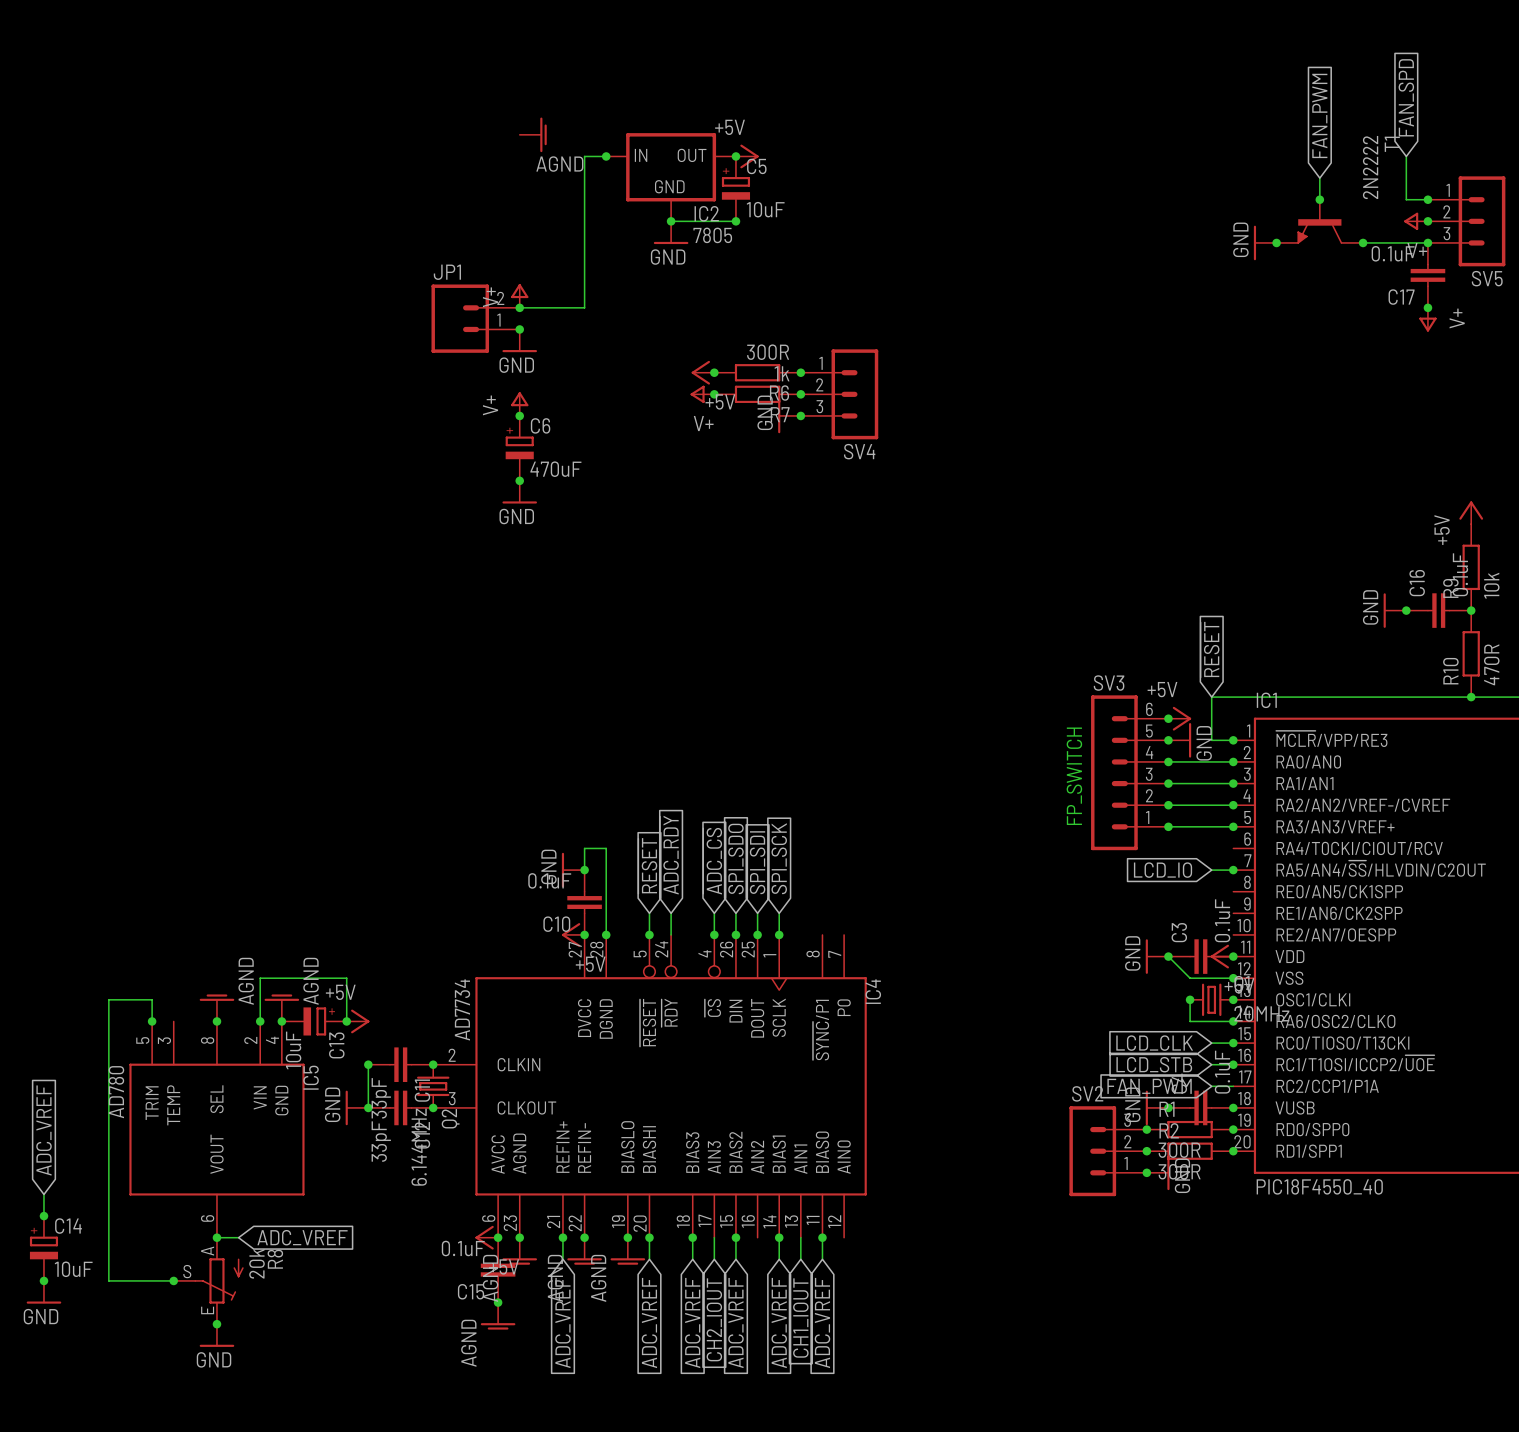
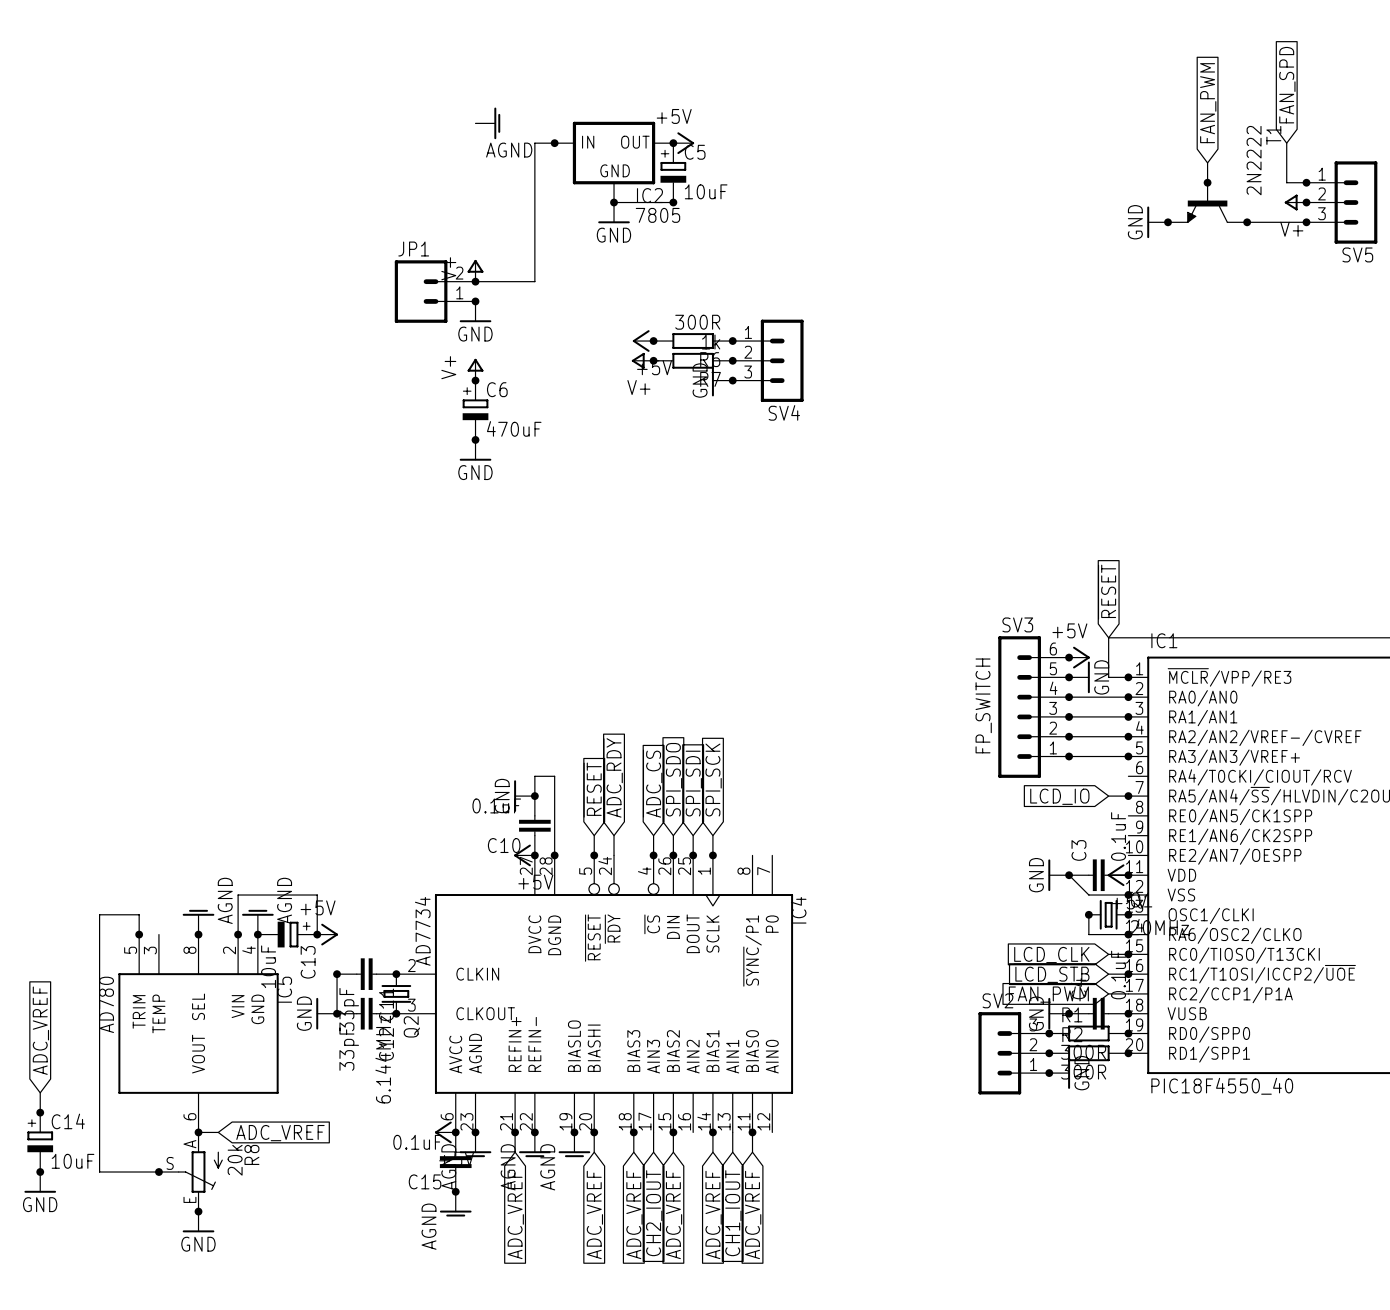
C17: 0.1uF (1427, 275) -> none
junction: (1427, 307) -> none
power symbol: V+ (1427, 319) -> none
power symbol: +5V (1471, 512) -> none
R9: 10k (1471, 567) -> none
power symbol: GND (1394, 610) -> none
junction: (1406, 610) -> none
C16: 0.1uF (1438, 610) -> none
junction: (1471, 610) -> none
R10: 470R (1471, 653) -> none
junction: (1471, 697) -> none

